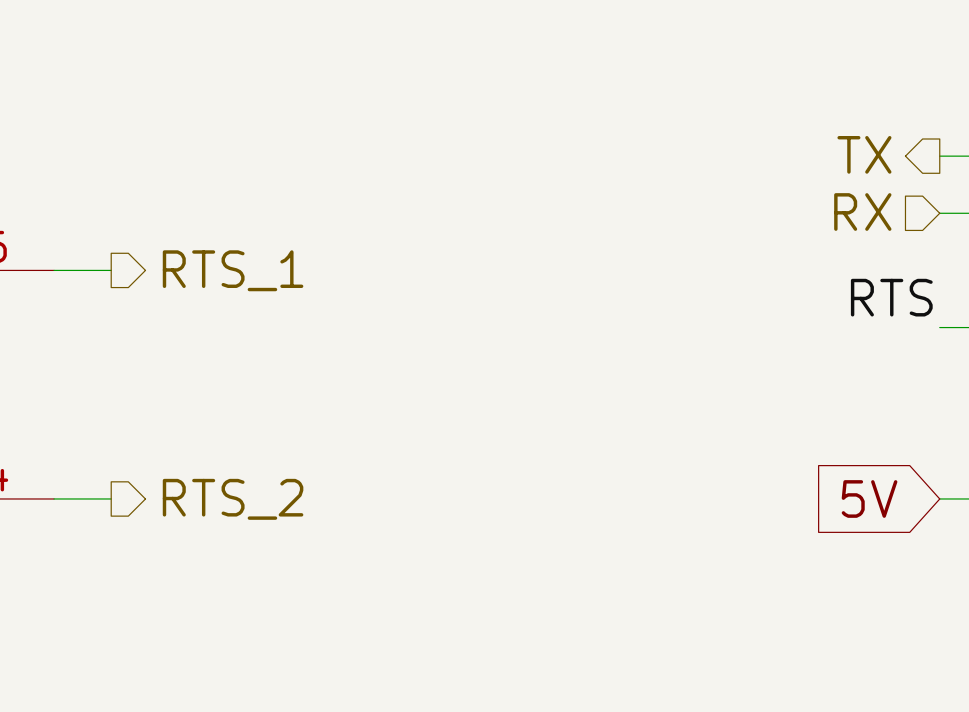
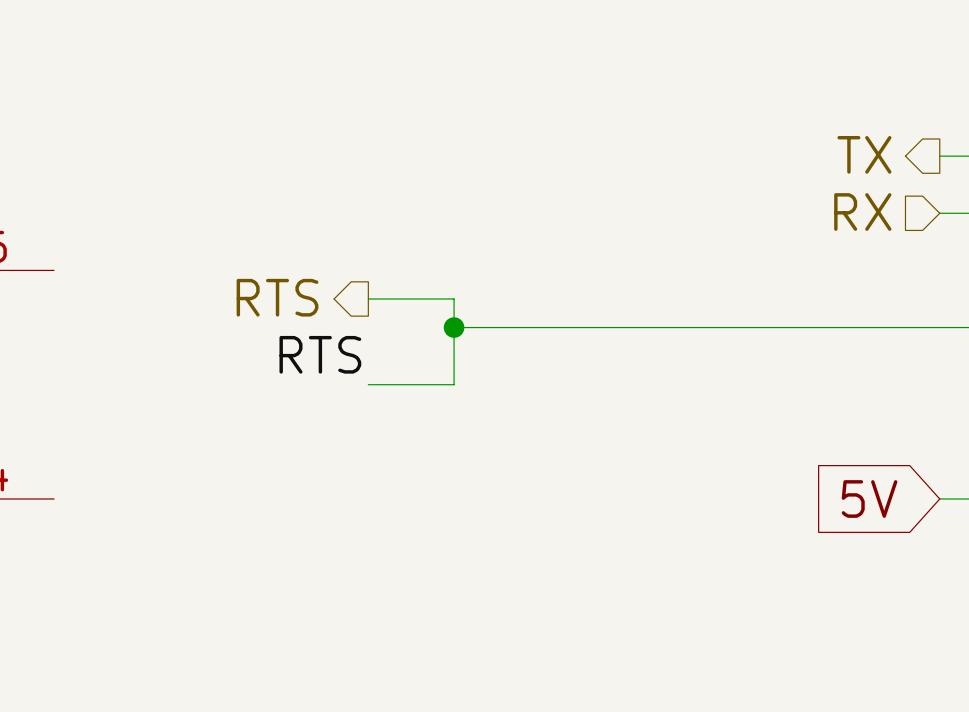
wire: (54, 270) (111, 270) -> none
hierarchical label: RTS_1 (233, 270) -> RTS (277, 297)
label: RTS (891, 297) -> none
wire: none -> (368, 298) (454, 298) (454, 384) (368, 384)
wire: none -> (454, 327) (939, 327)
junction: none -> (454, 327)
label: none -> RTS (320, 354)
wire: (54, 498) (111, 498) -> none
hierarchical label: RTS_2 (233, 499) -> none

